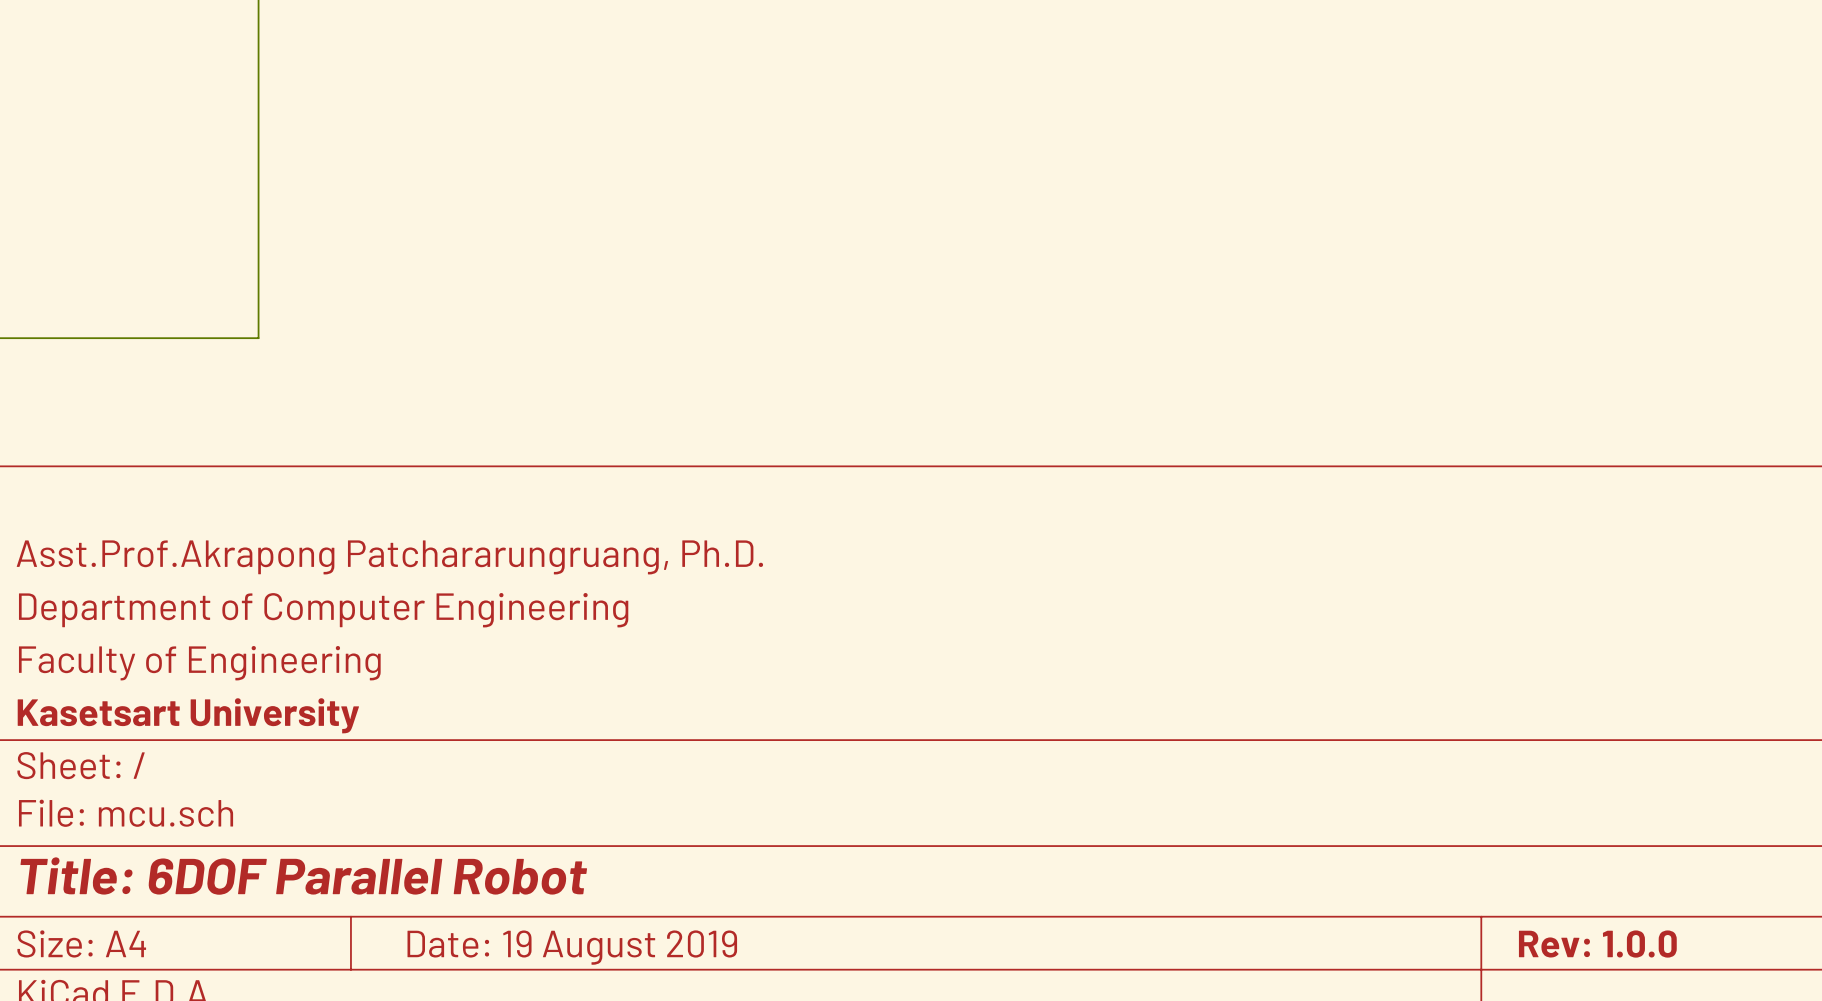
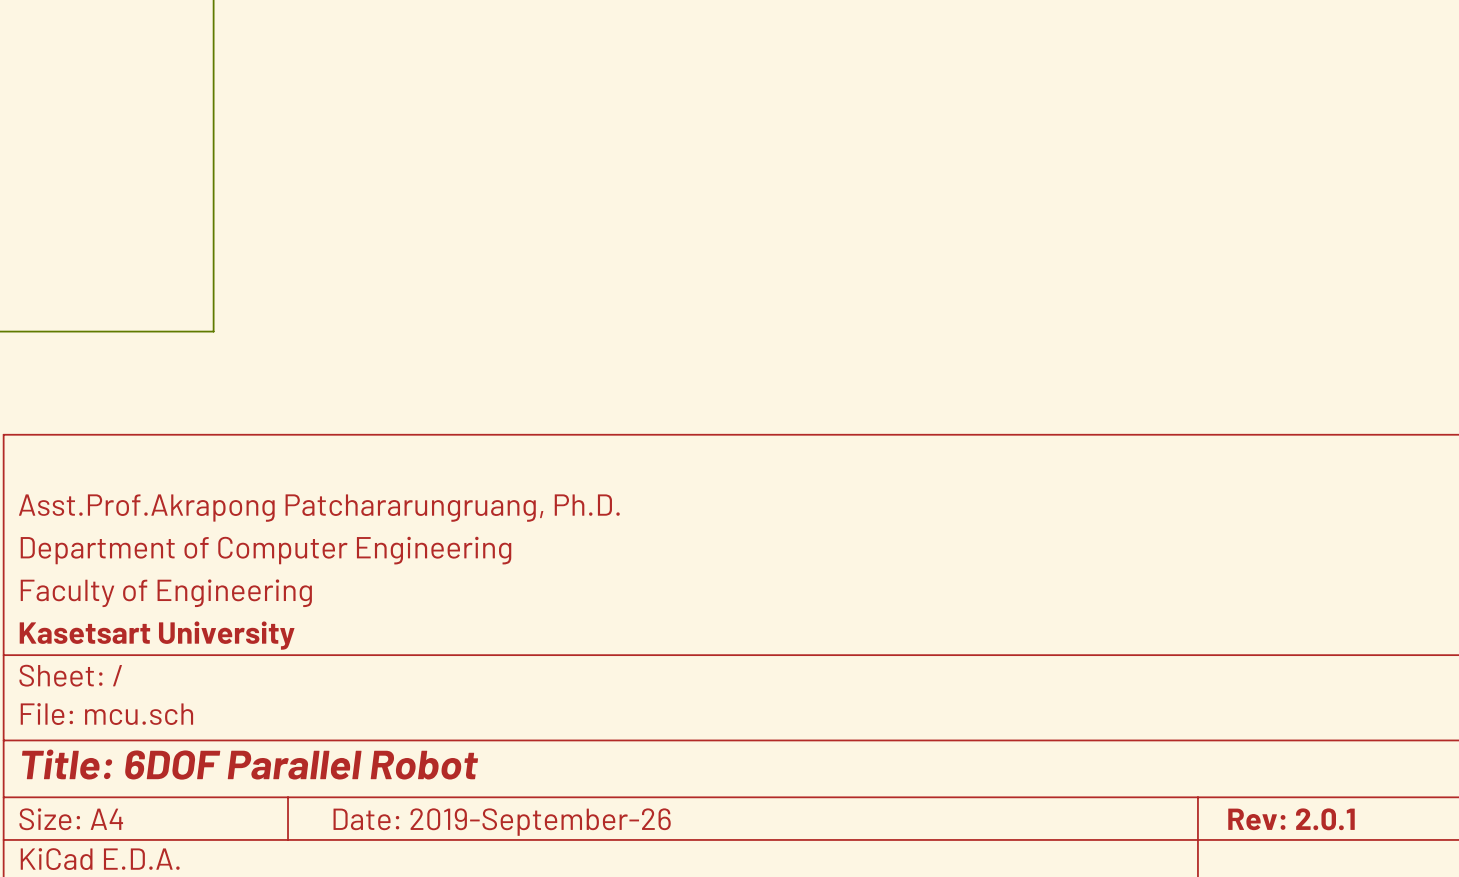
title block: Rev: 1.0.0 (1597, 944) -> Rev: 2.0.1 (1291, 819)
title block: Date: 19 August 2019 (572, 947) -> Date: 2019-September-26 (502, 822)

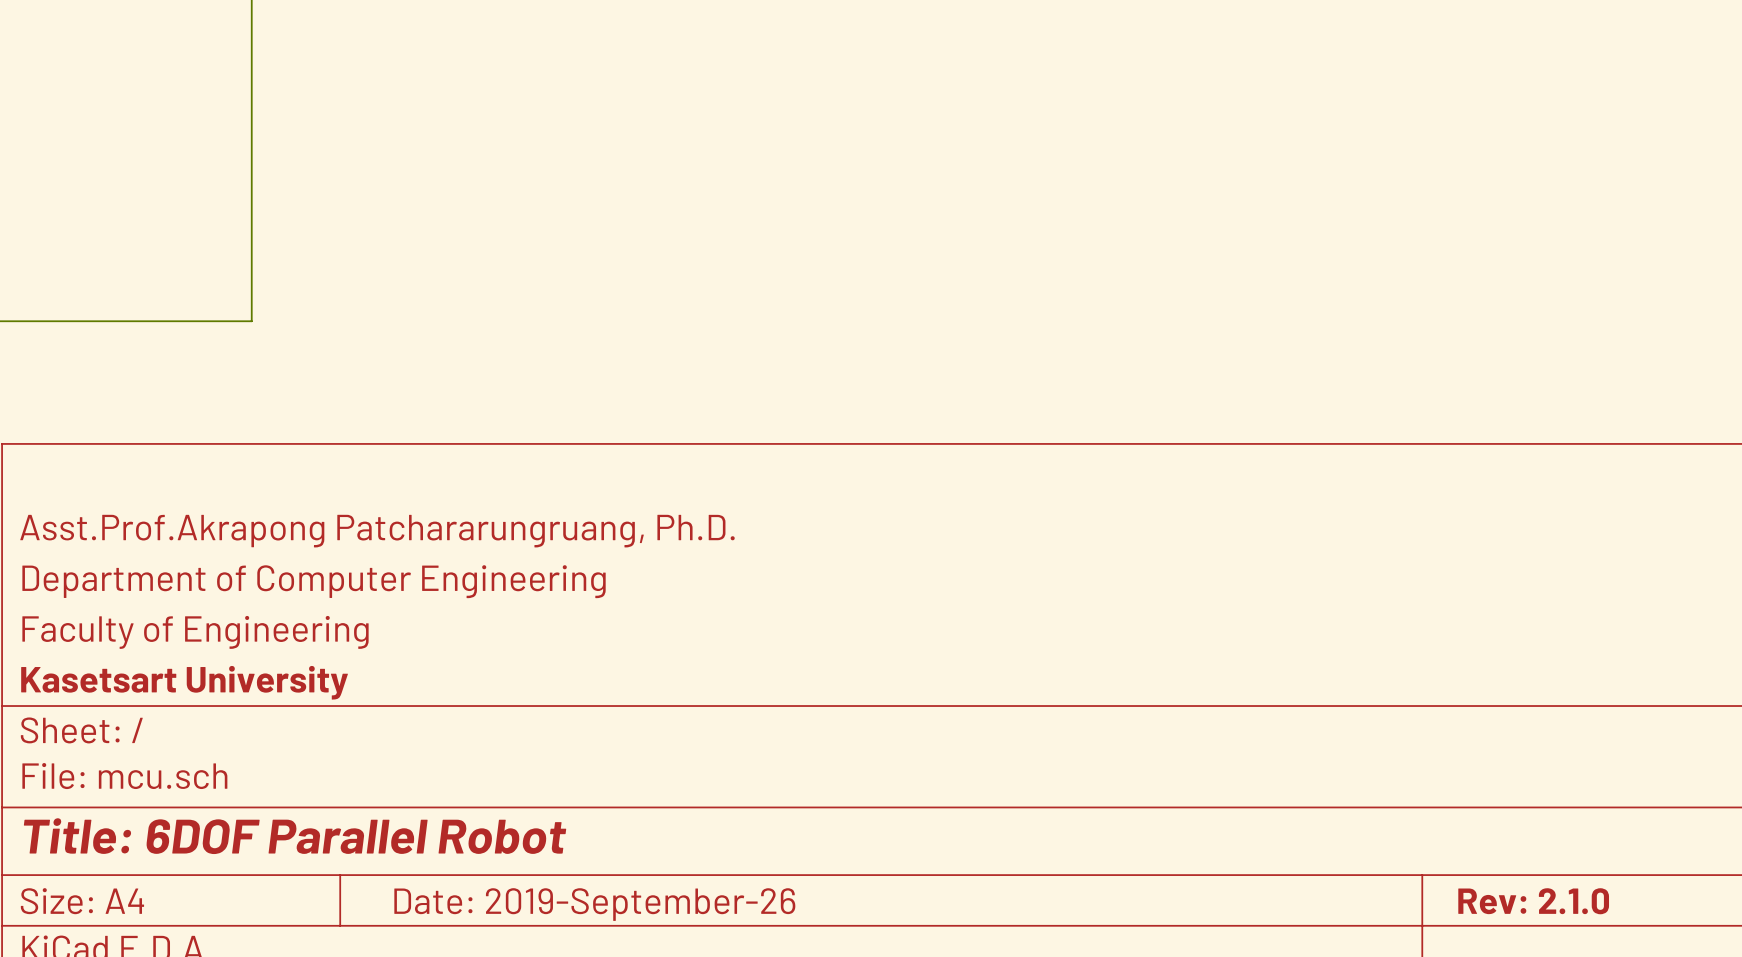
title block: Rev: 2.0.1 (1291, 819) -> Rev: 2.1.0 (1533, 901)

